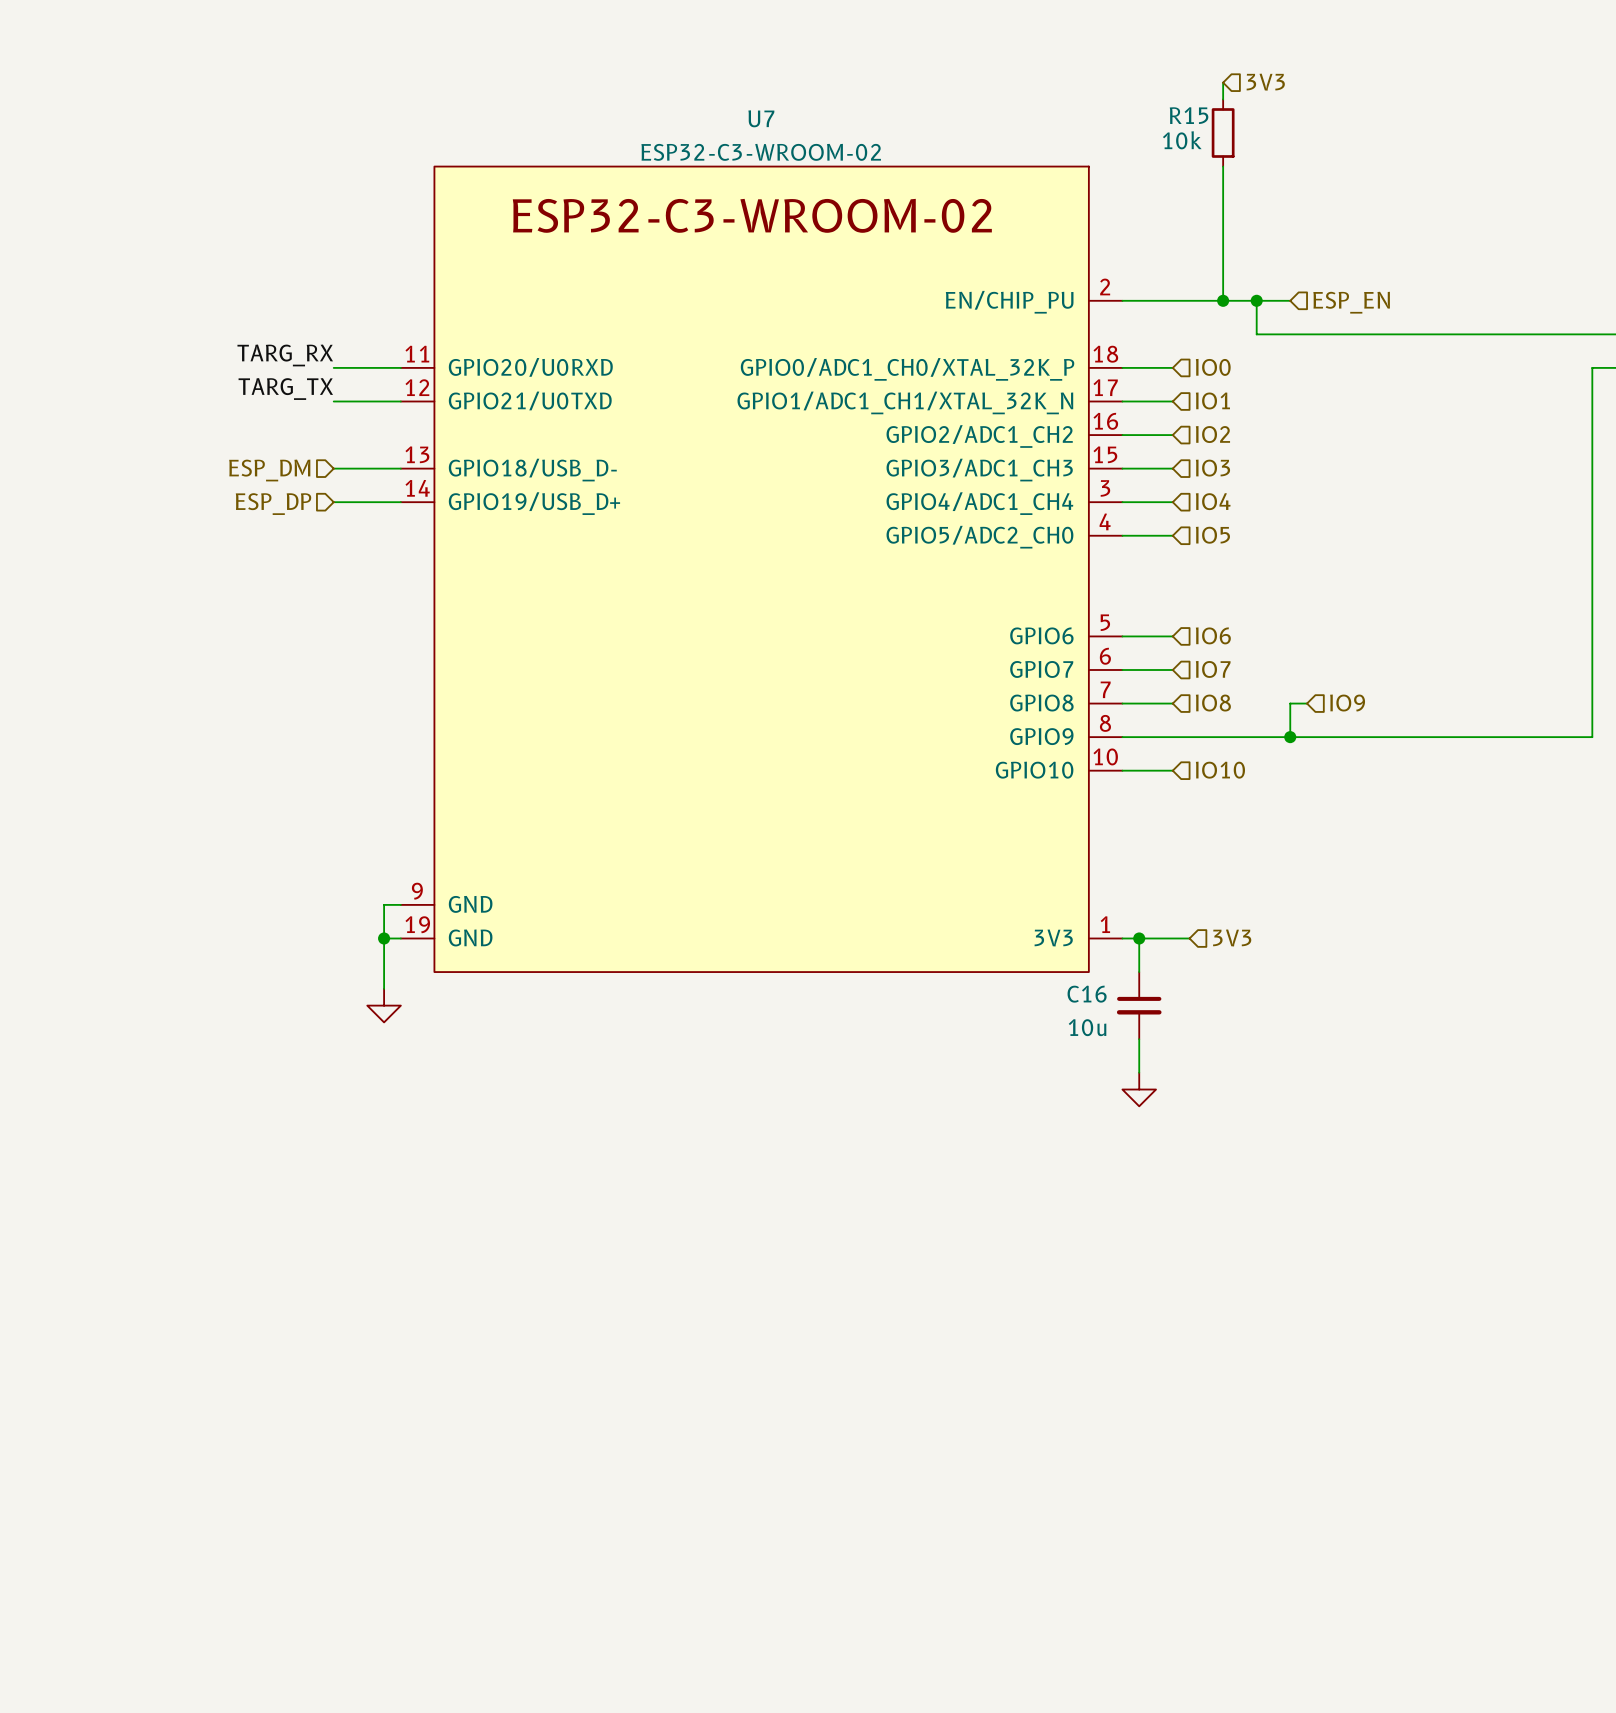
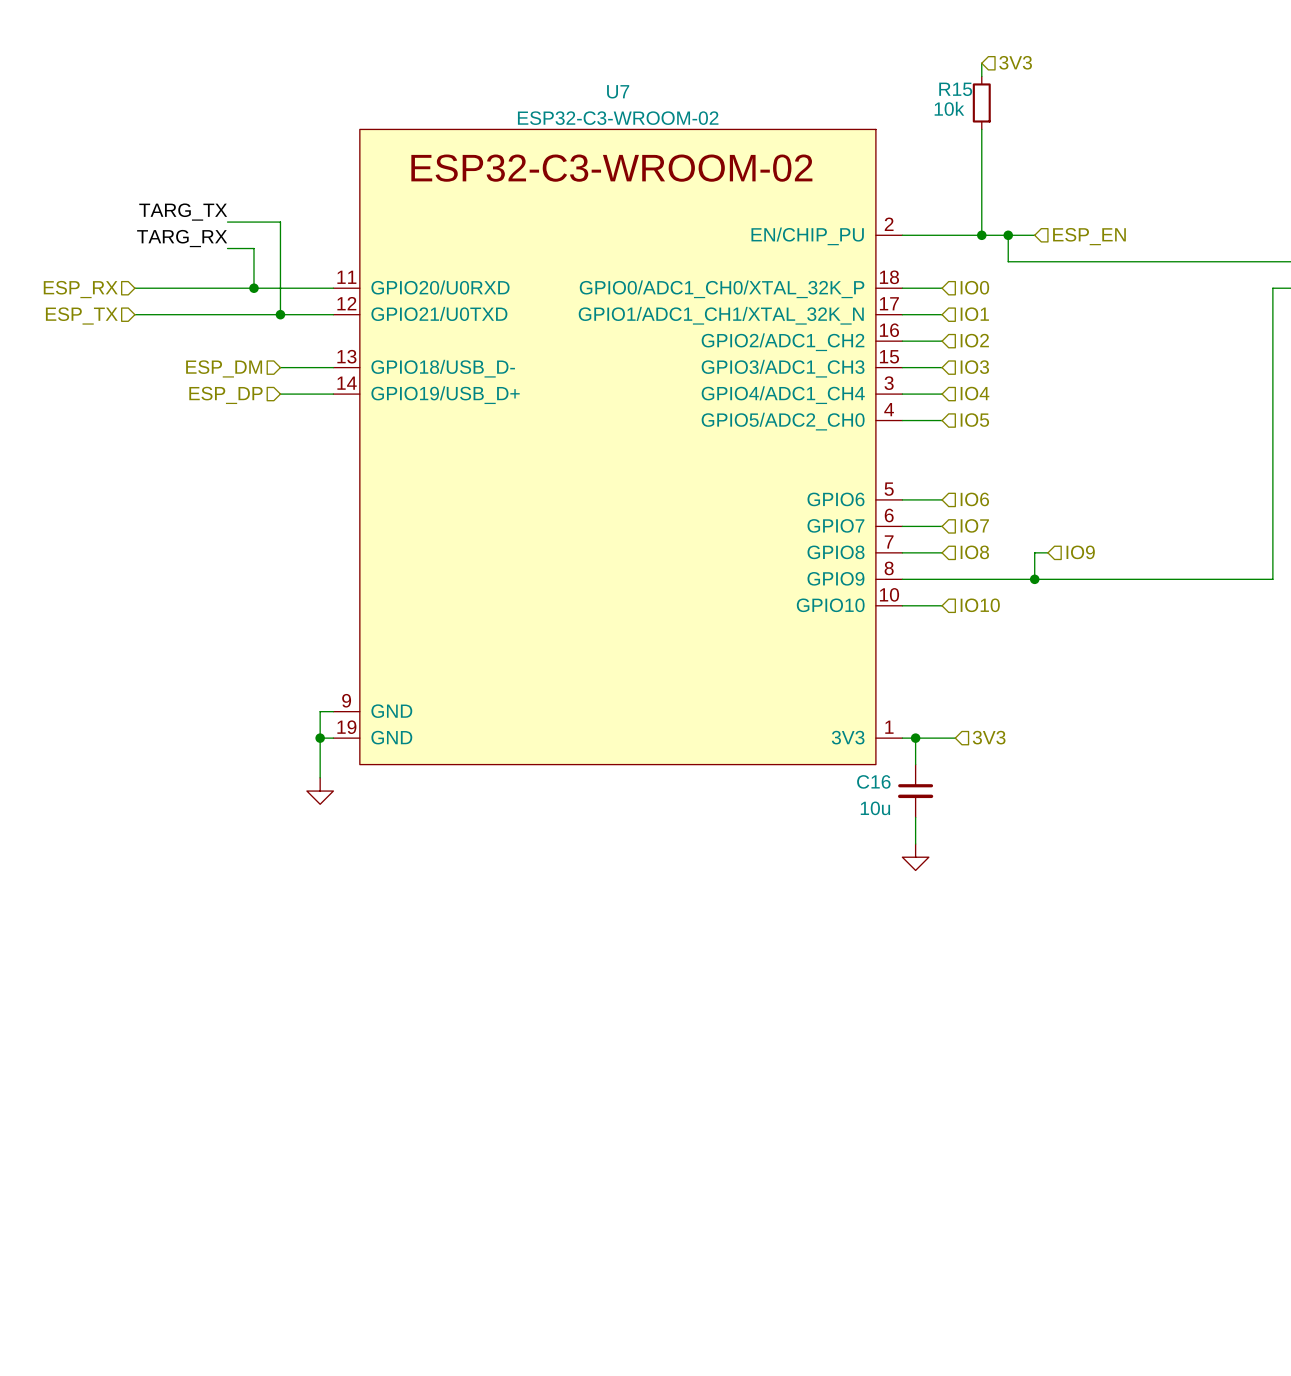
wire: none -> (227, 222) (280, 222) (280, 314) (134, 314)
wire: none -> (227, 248) (253, 248) (253, 288)
label position: TARG_RX (285, 355) -> TARG_RX (182, 238)
wire: none -> (134, 288) (280, 288)
junction: none -> (253, 288)
hierarchical label: none -> ESP_RX (80, 289)
label position: TARG_TX (285, 389) -> TARG_TX (183, 212)
junction: none -> (280, 314)
hierarchical label: none -> ESP_TX (81, 316)

